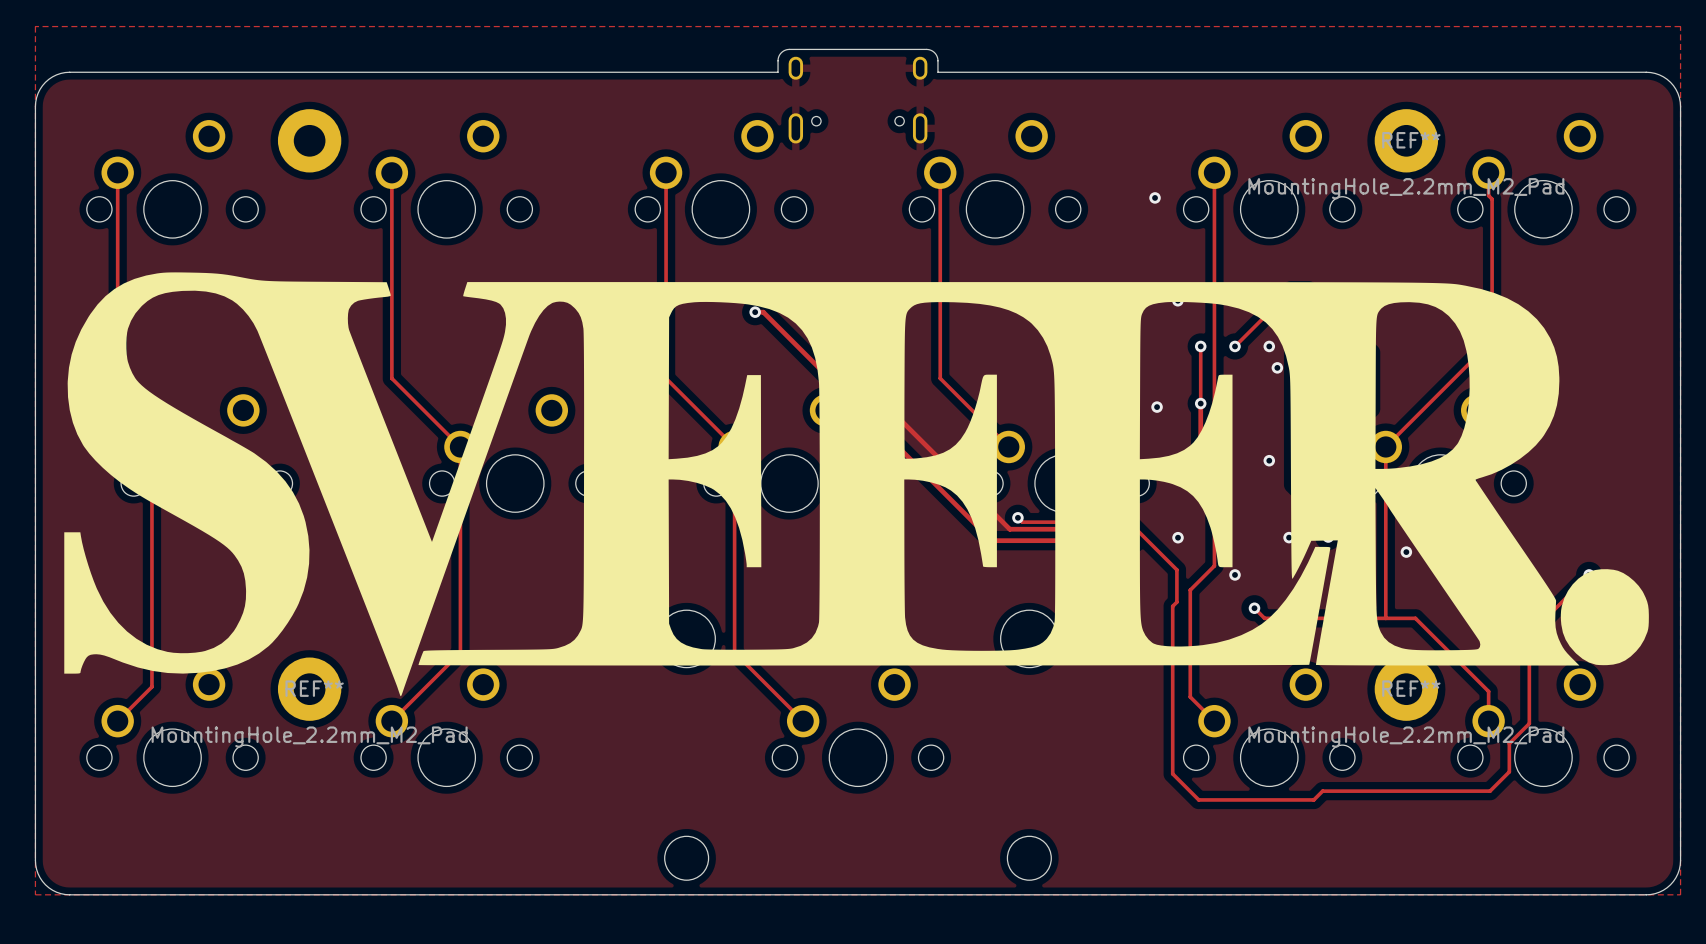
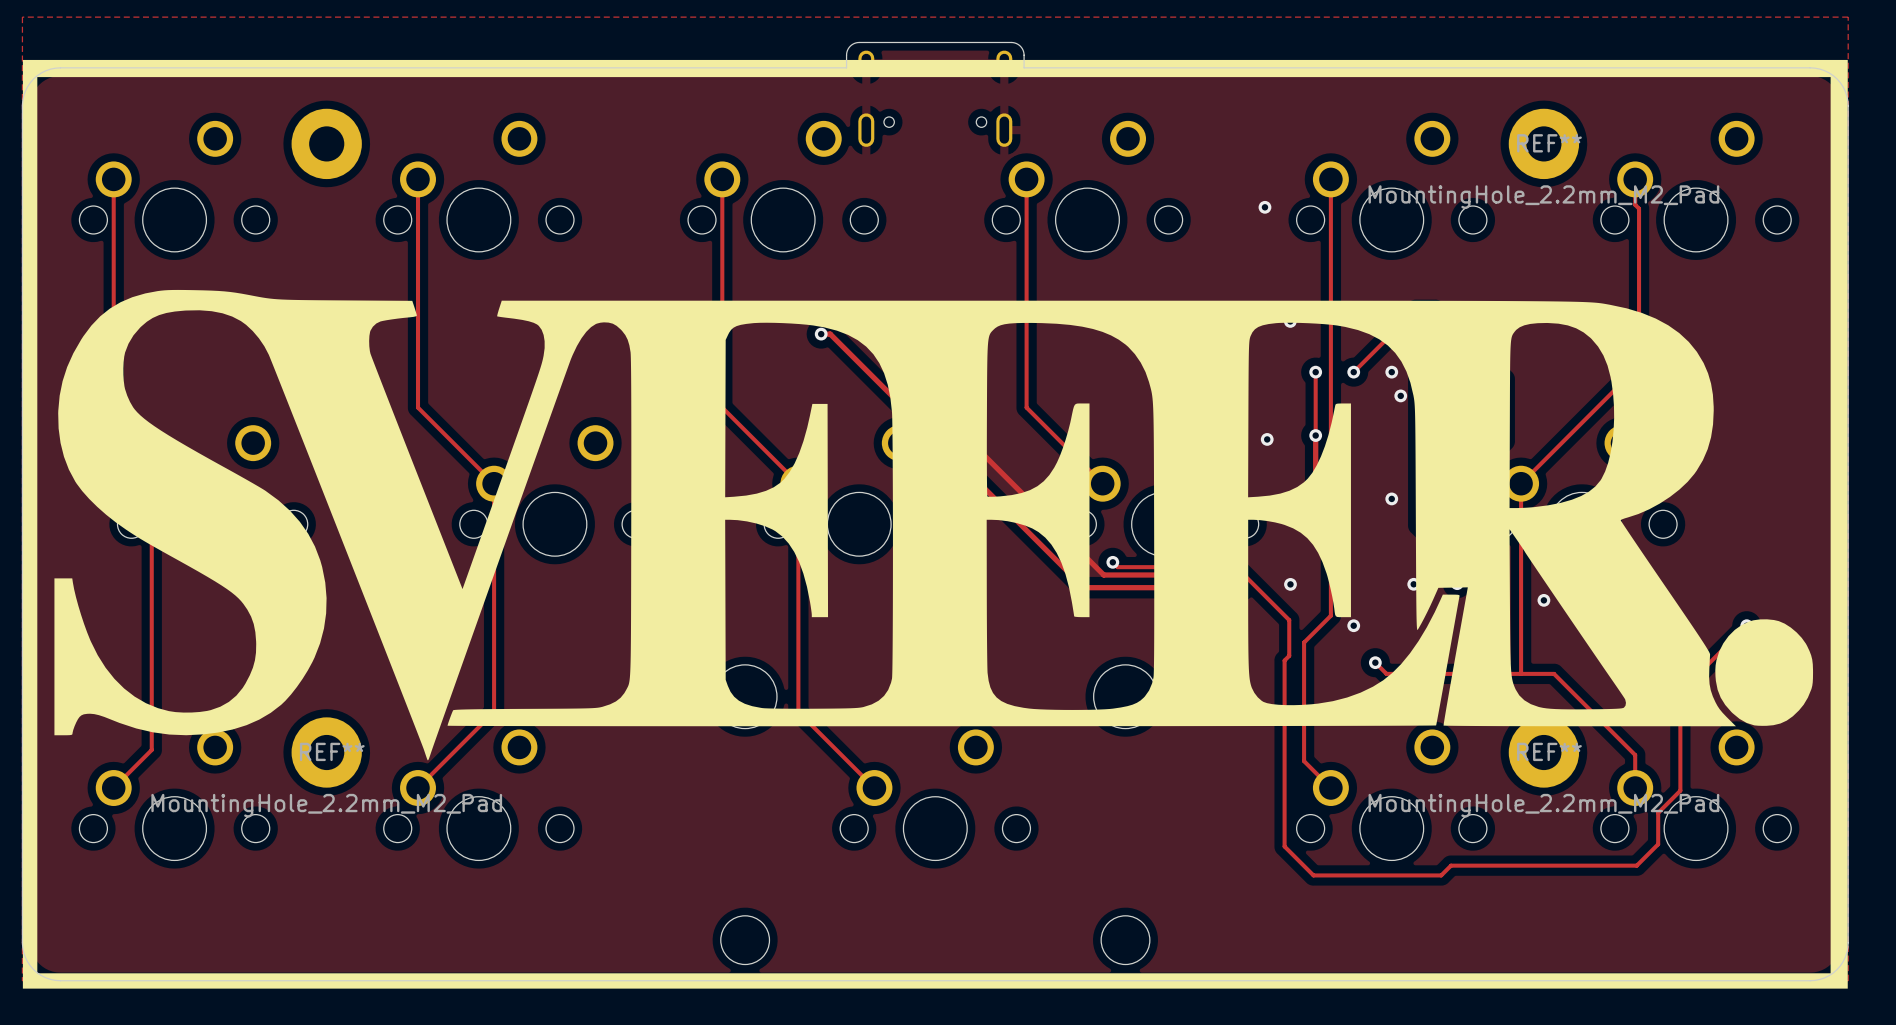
part footprint: [64, 272, 1649, 697] -> [22, 59, 1848, 989]

